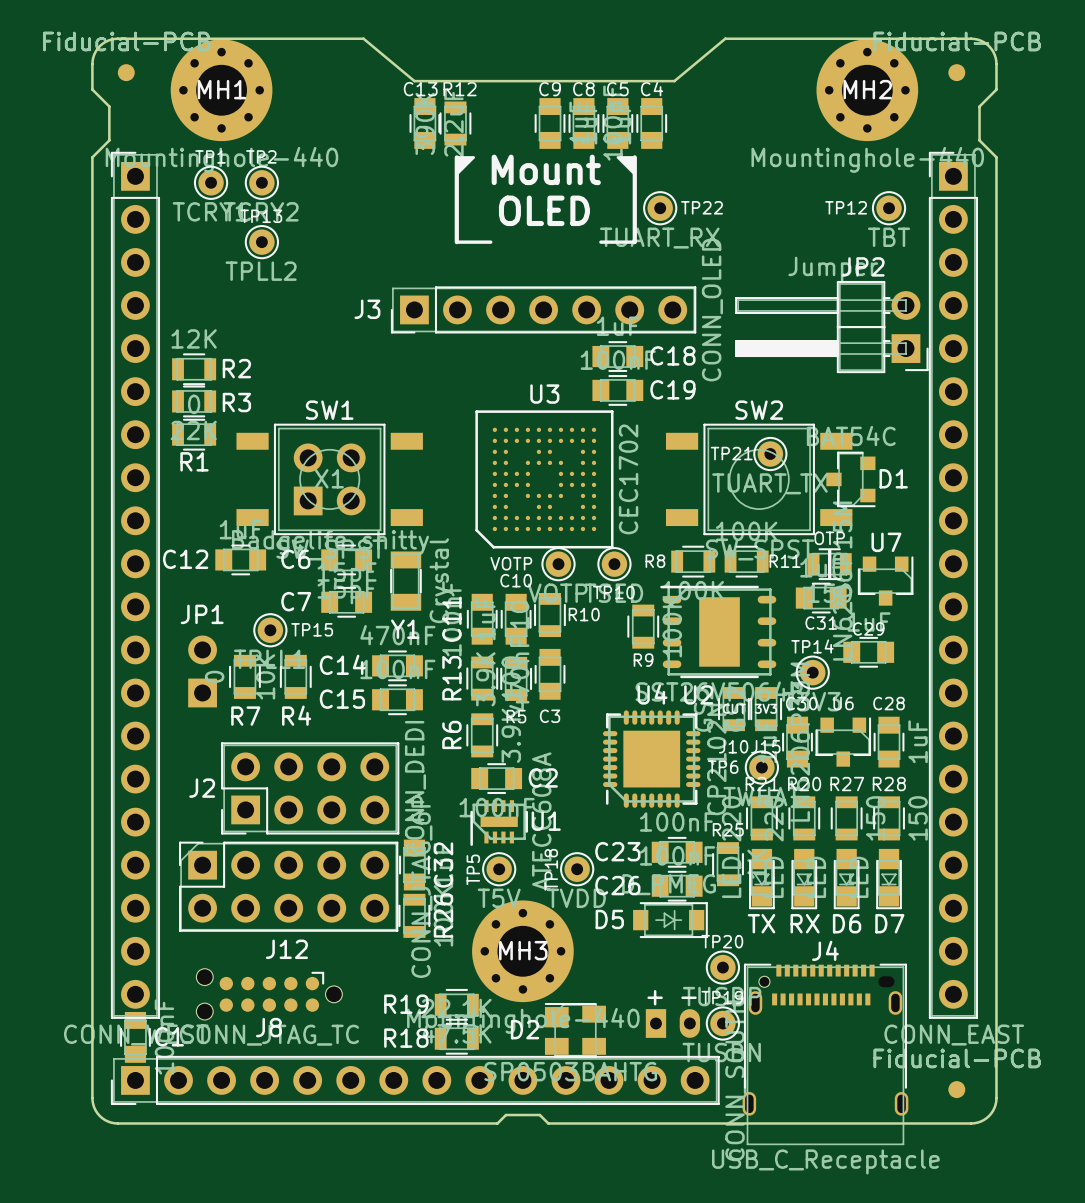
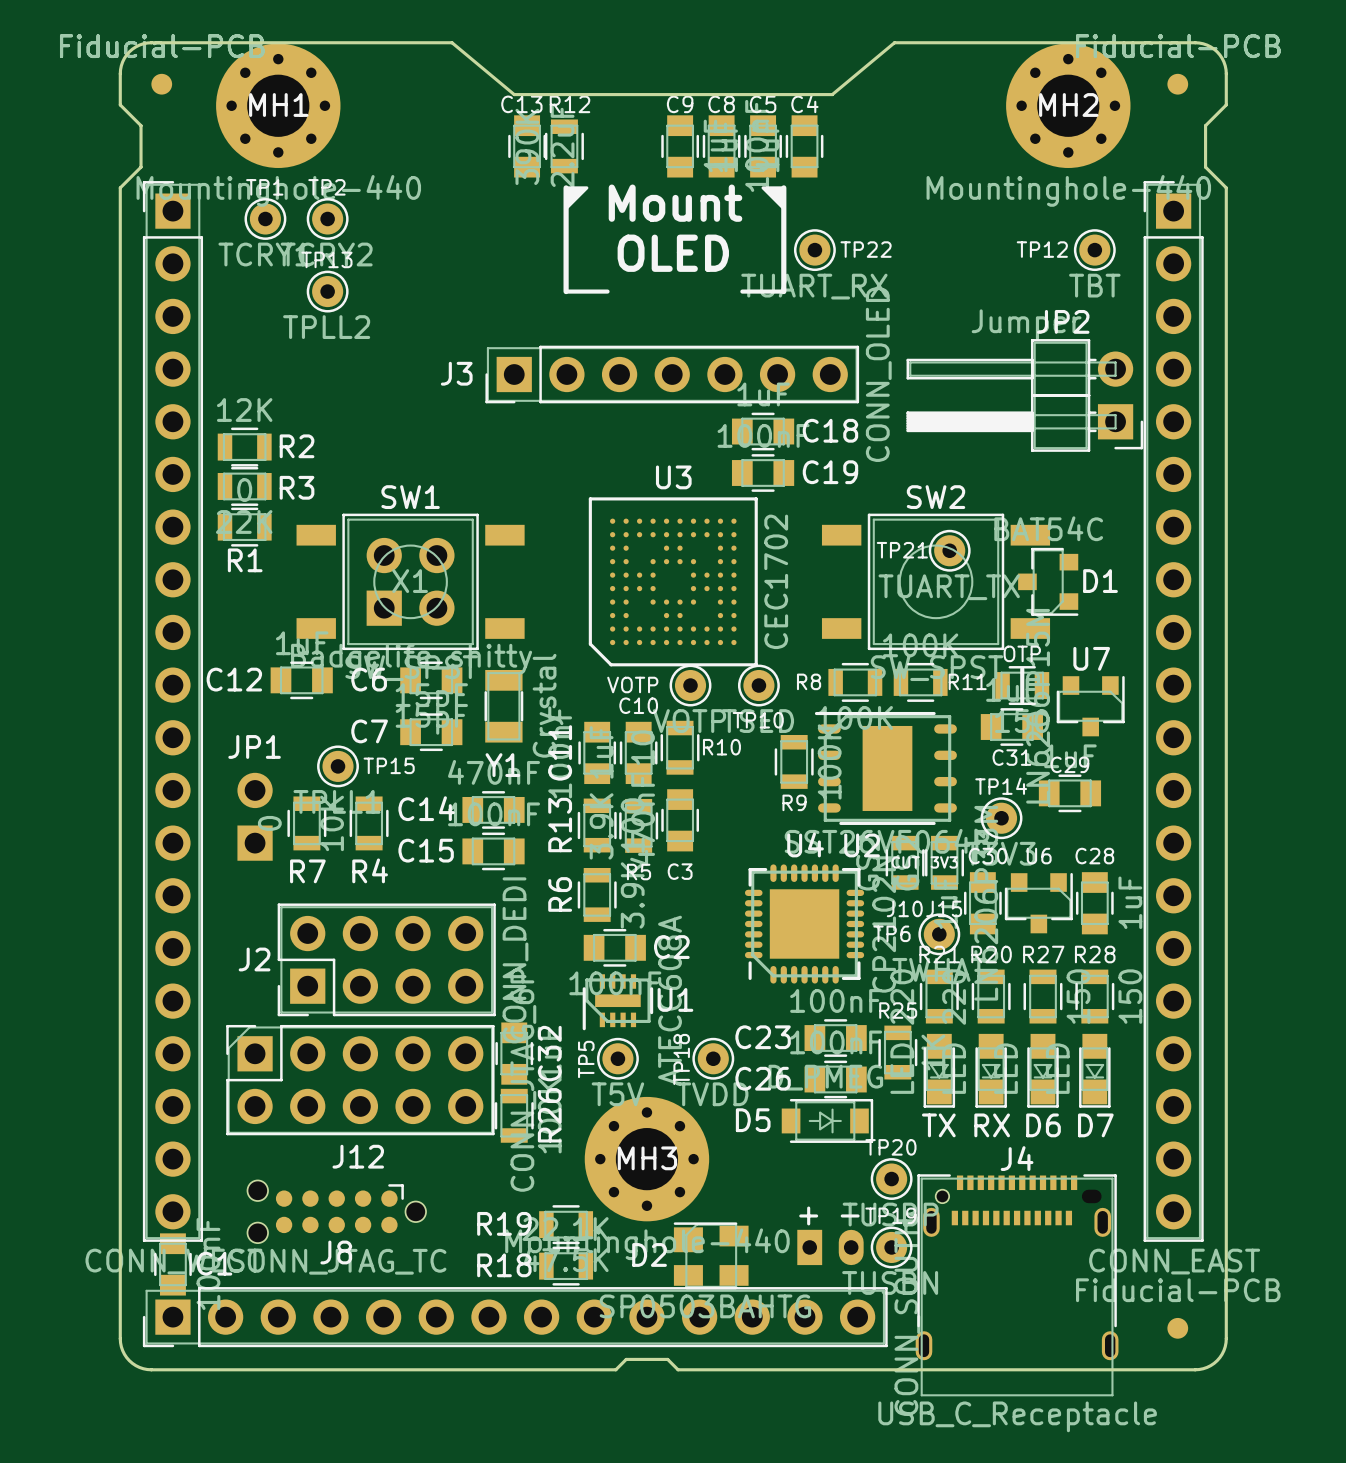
part: Fiducial-PCB (957, 1058) -> none

